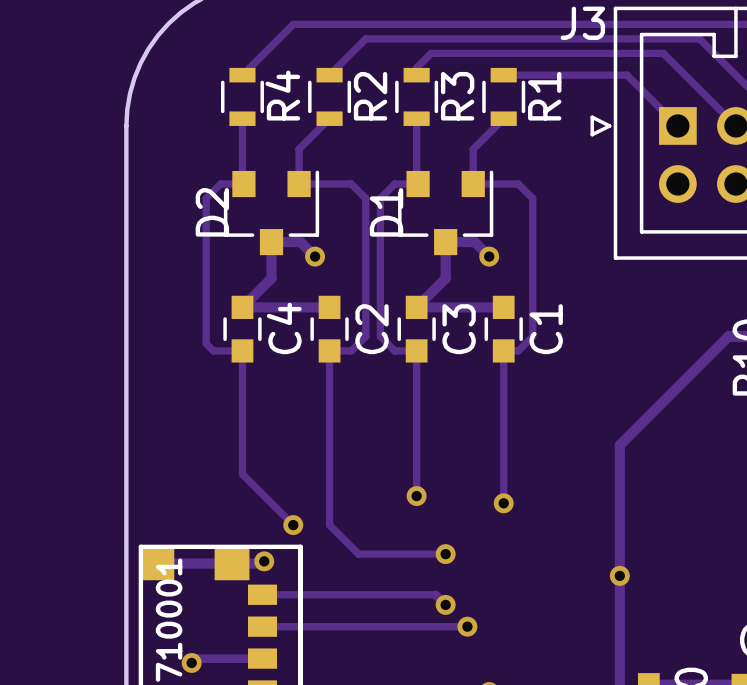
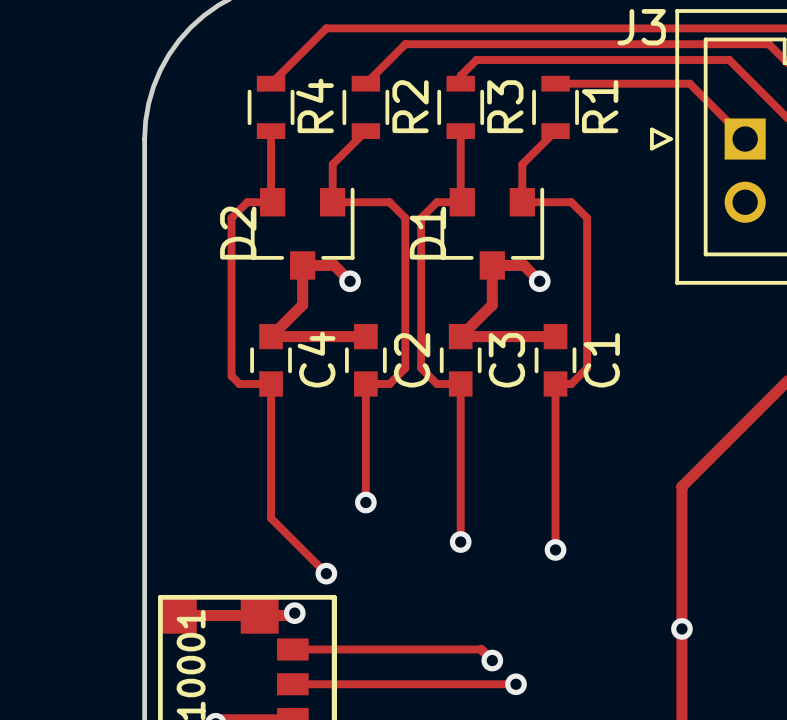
track: (329, 459) (329, 525) (358, 554) (445, 554) -> none
via position: (445, 554) -> (365, 502)

